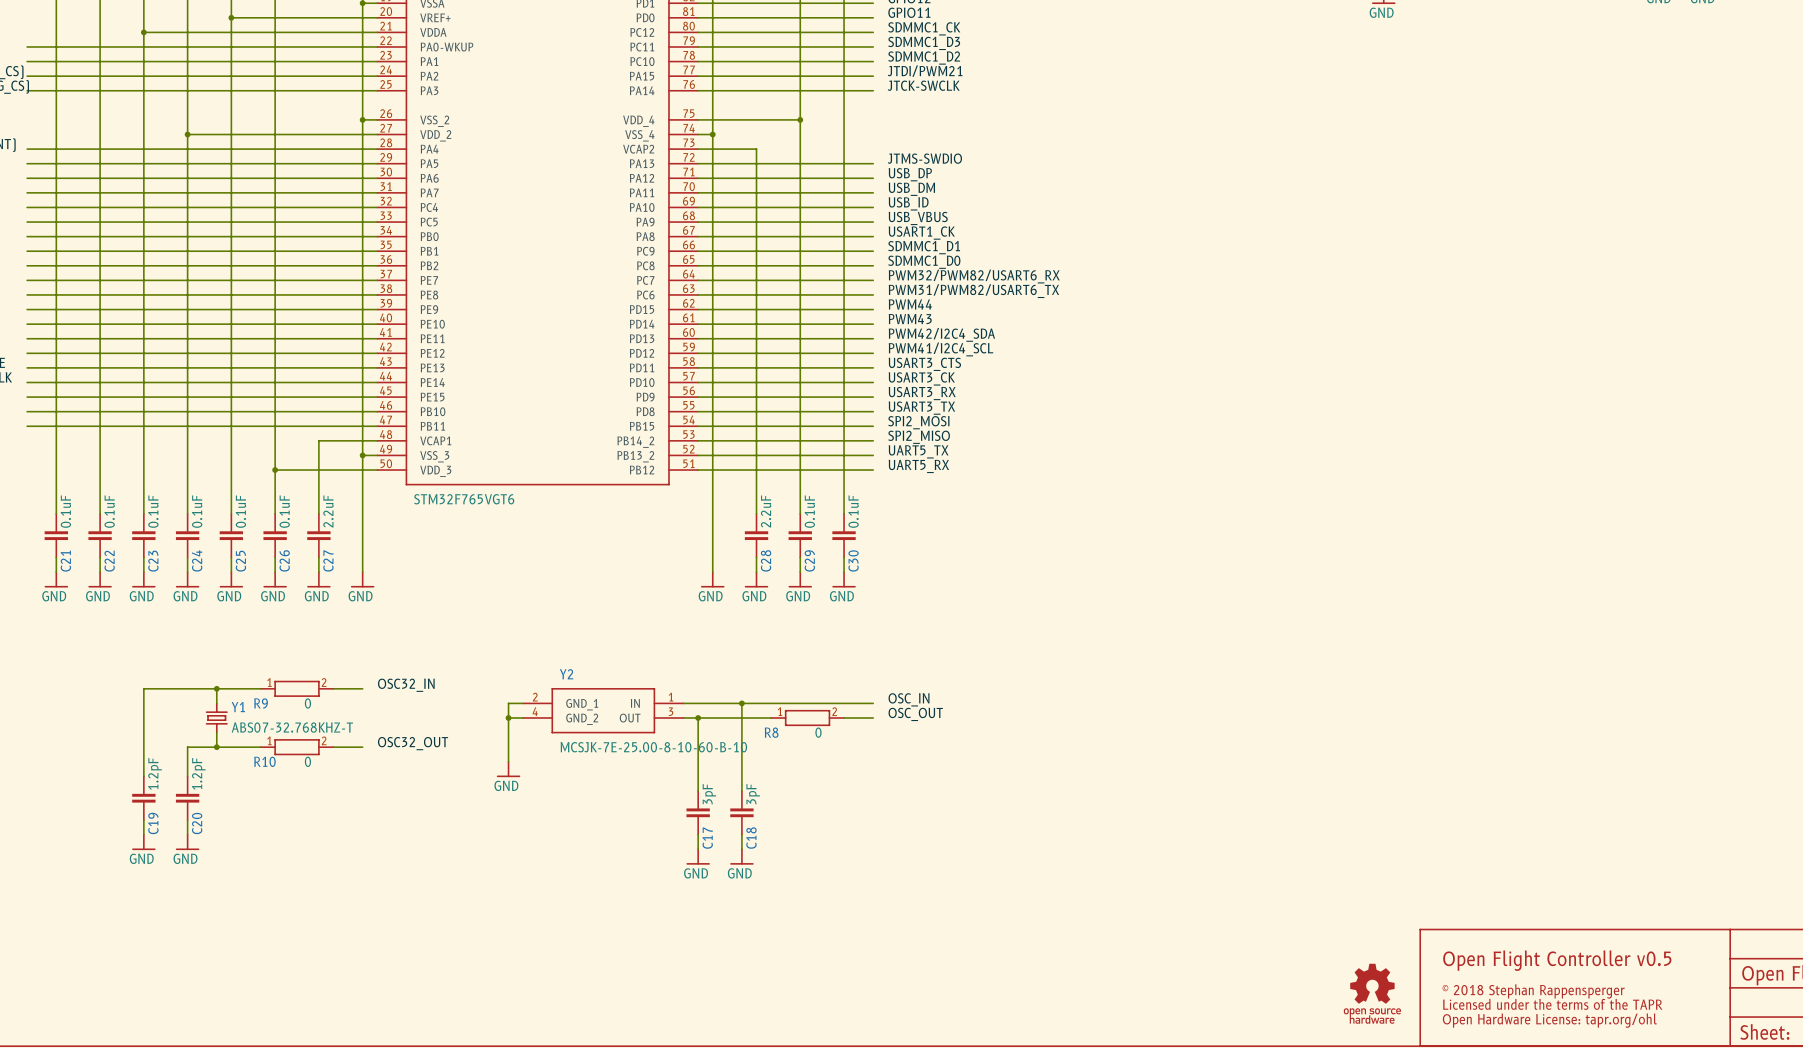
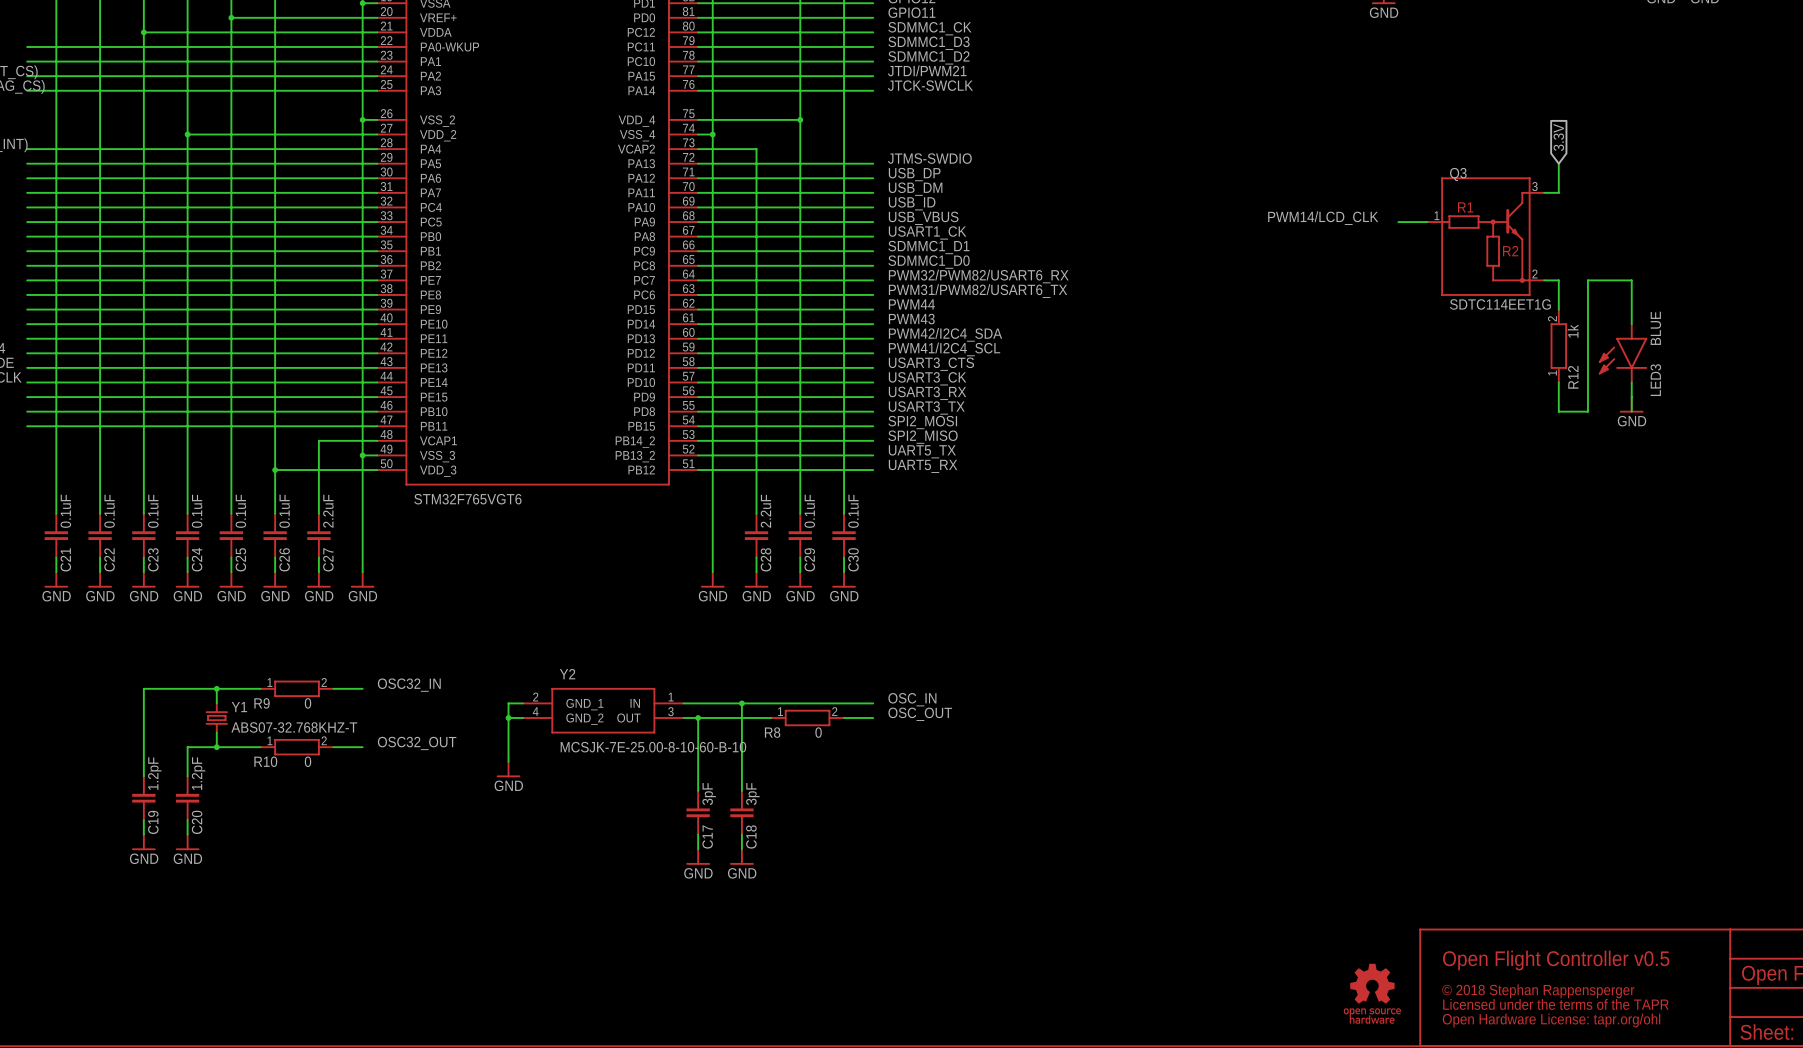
global label: none -> 3.3V (1558, 137)
wire: none -> (1558, 163) (1558, 192) (1544, 192)
label: none -> PWM14/LCD_CLK (1323, 218)
wire: none -> (1398, 222) (1427, 222)
Q3: none -> SDTC114EET1G (1485, 236)
wire: none -> (1544, 280) (1558, 280) (1558, 309)
wire: none -> (1631, 324) (1631, 280) (1587, 280) (1587, 411) (1558, 411) (1558, 382)
R12: none -> 1k (1558, 346)
LED3: none -> BLUE (1622, 353)
wire: none -> (1631, 382) (1631, 411)
power symbol: none -> GND (1631, 404)

